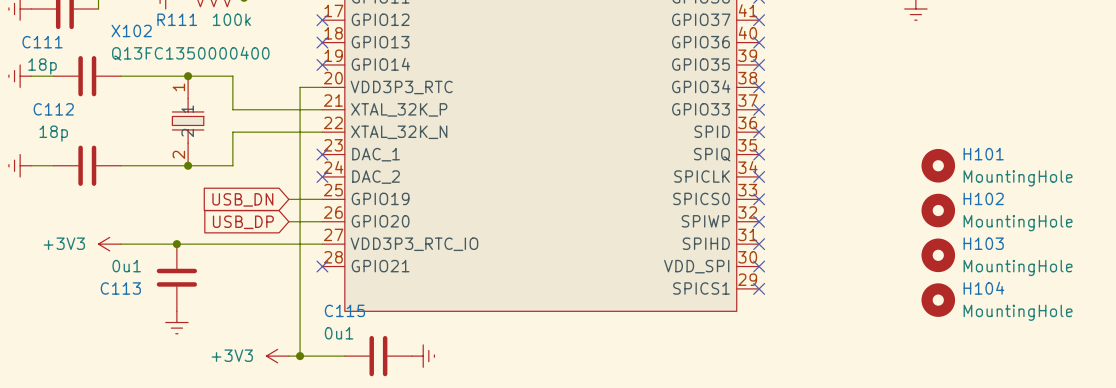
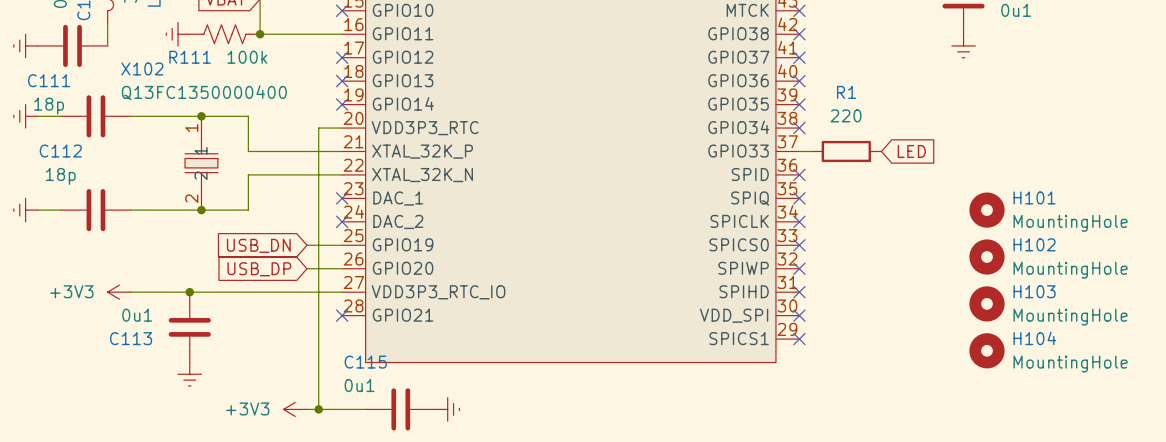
wire: none -> (799, 151) (811, 151)
no-connect mark: (759, 109) -> none
R1: none -> 220 (846, 151)
global label: none -> LED (911, 151)

